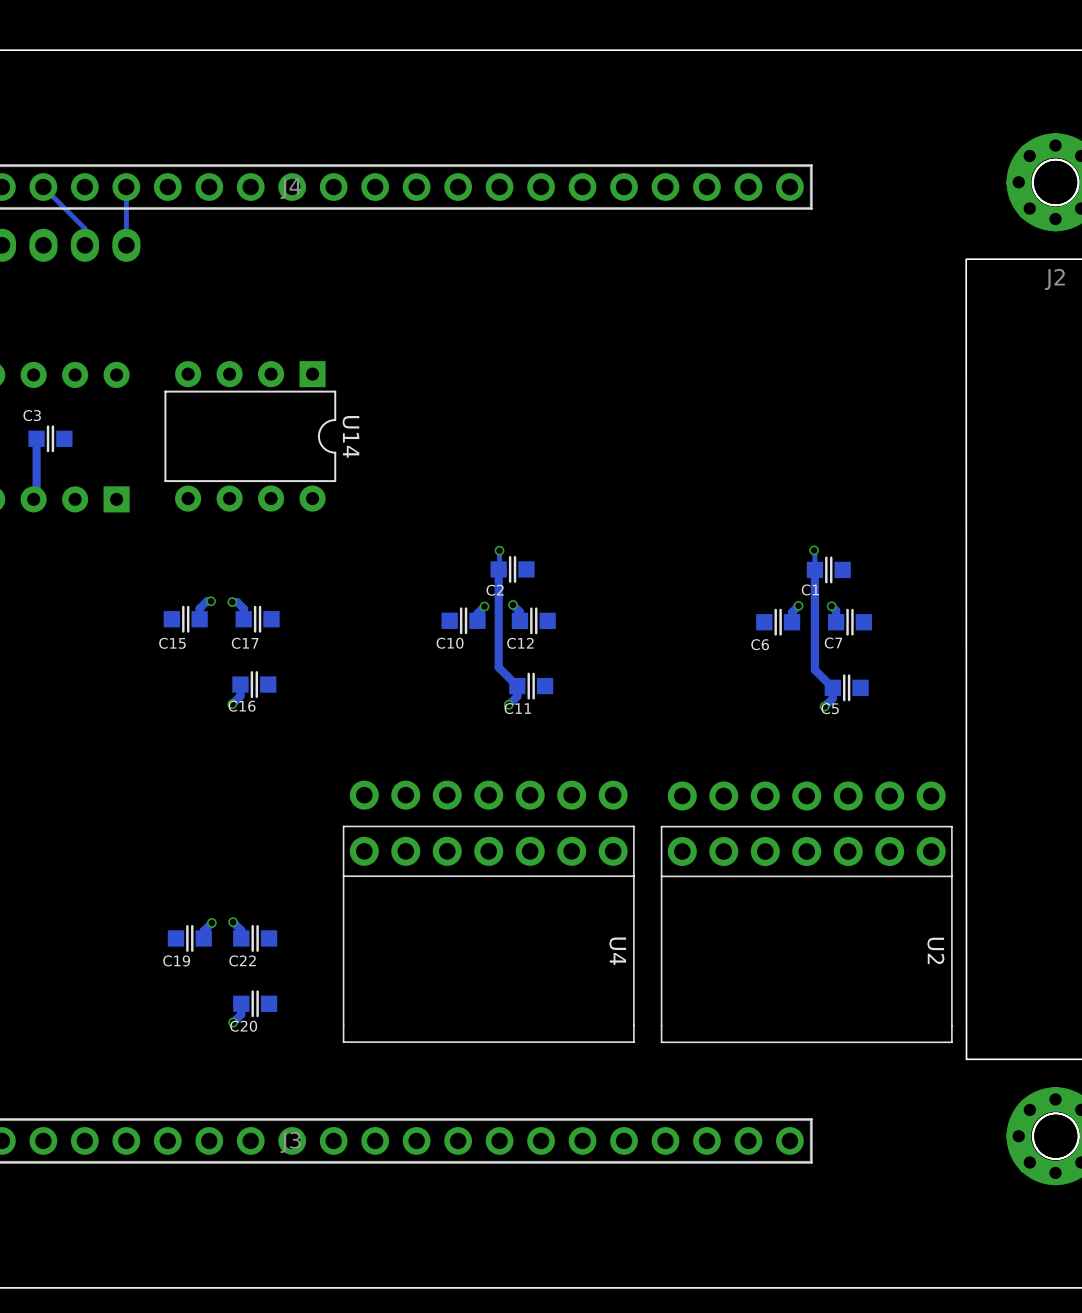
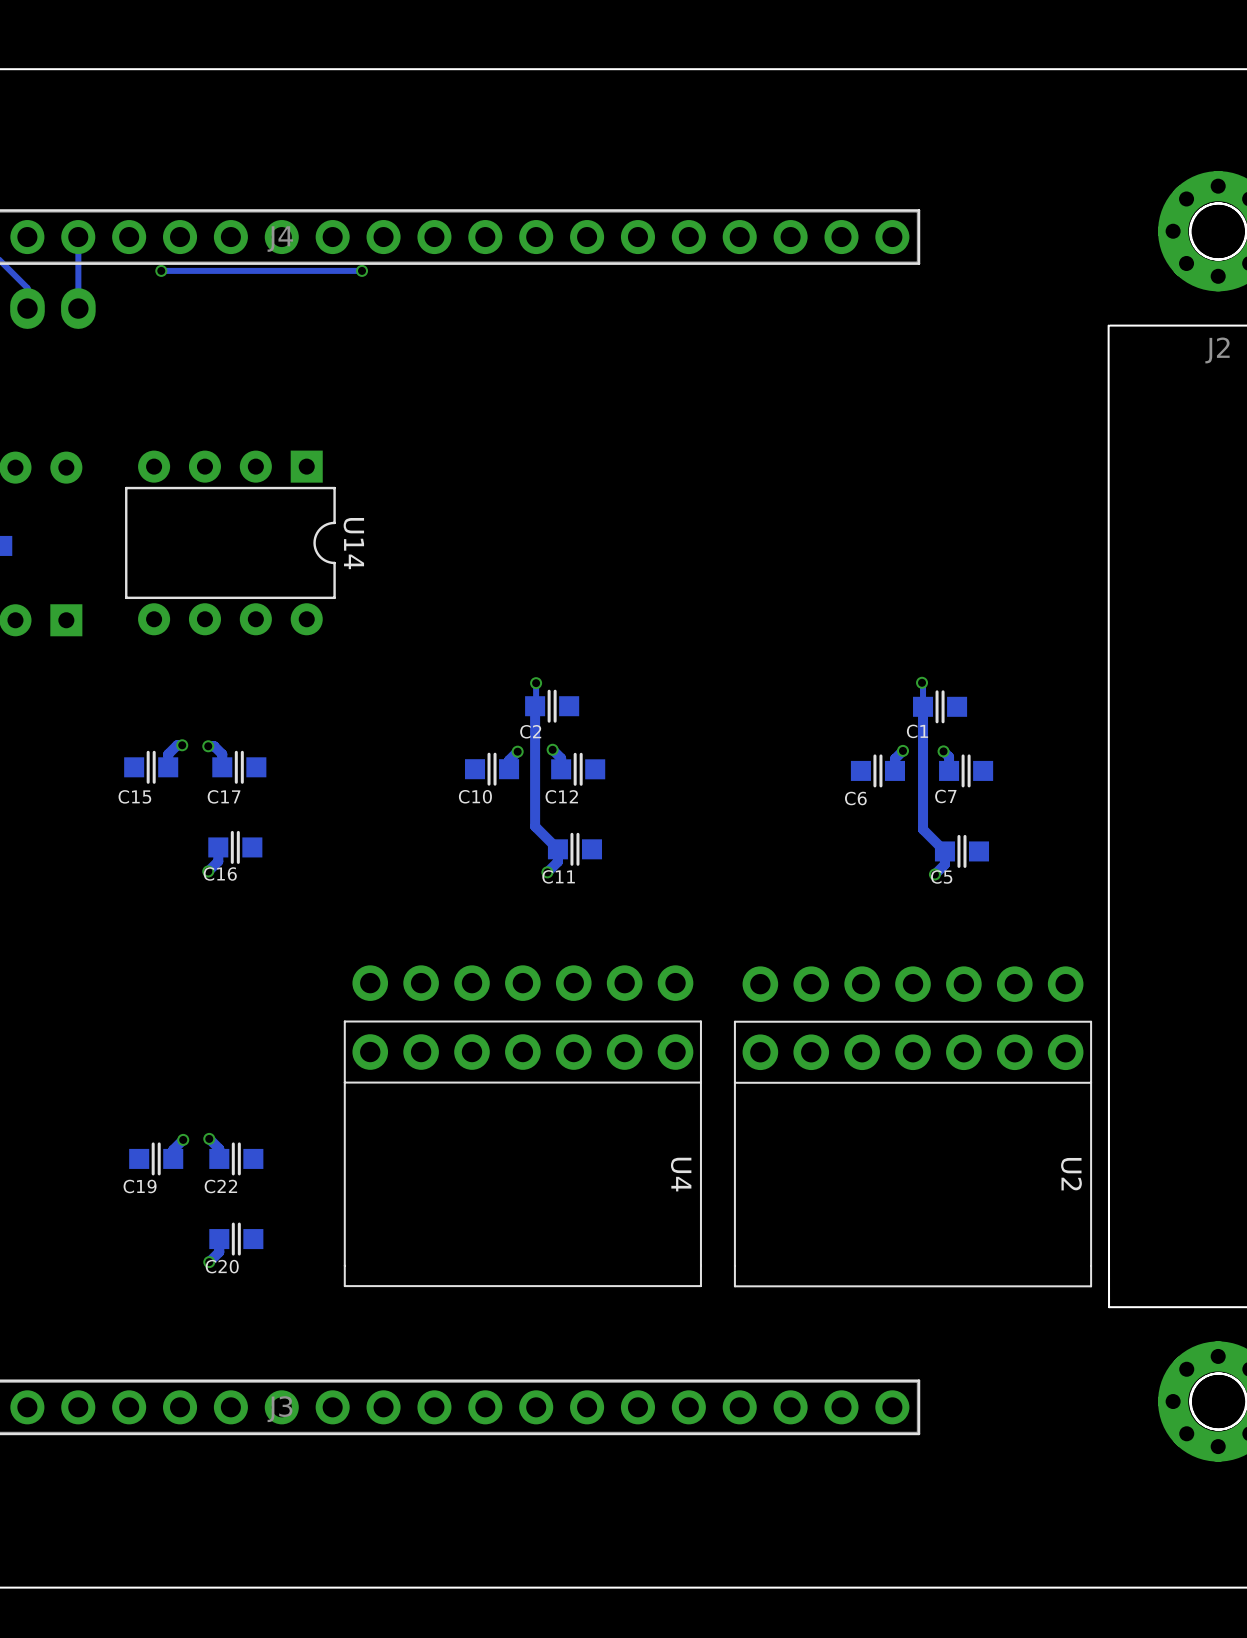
via: none -> (161, 270)
track: none -> (362, 270) (161, 270)
via: none -> (362, 270)

